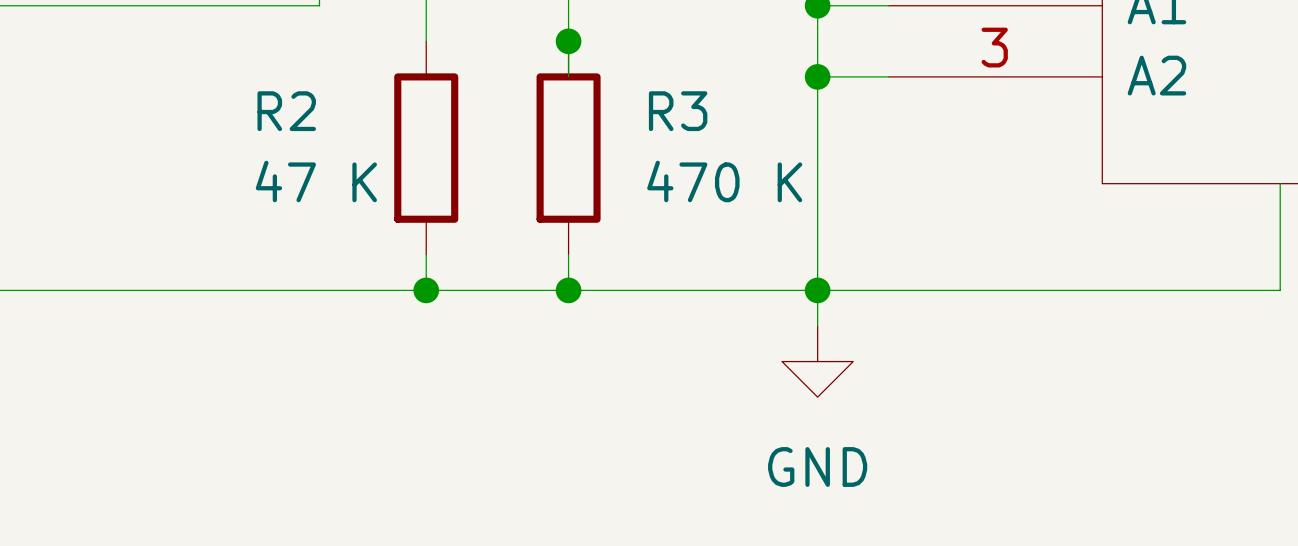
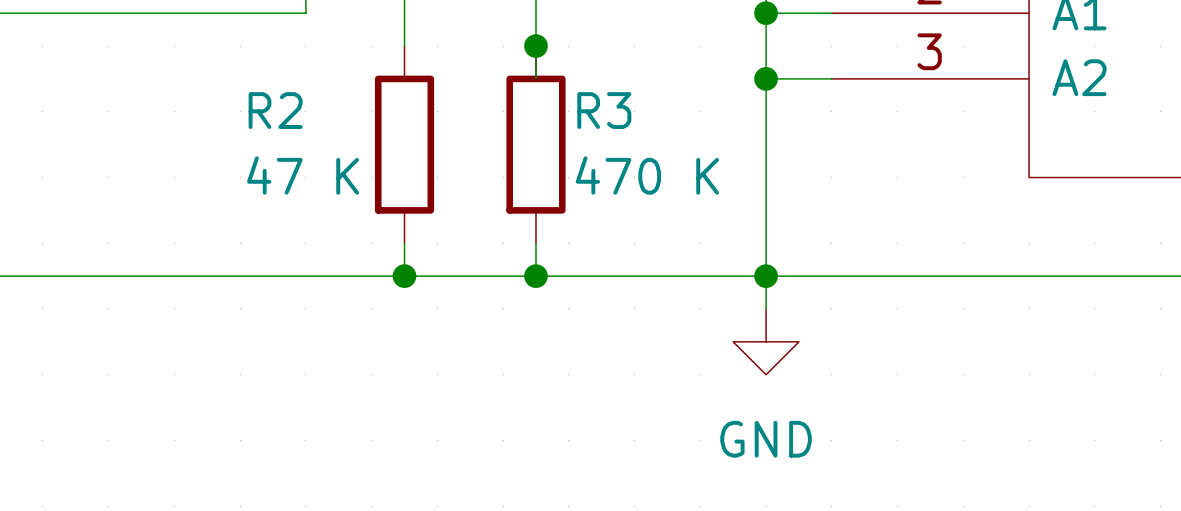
R3 name position: R3 (678, 111) -> R3 (604, 110)
R3 value position: 470 K (724, 181) -> 470 K (647, 175)

